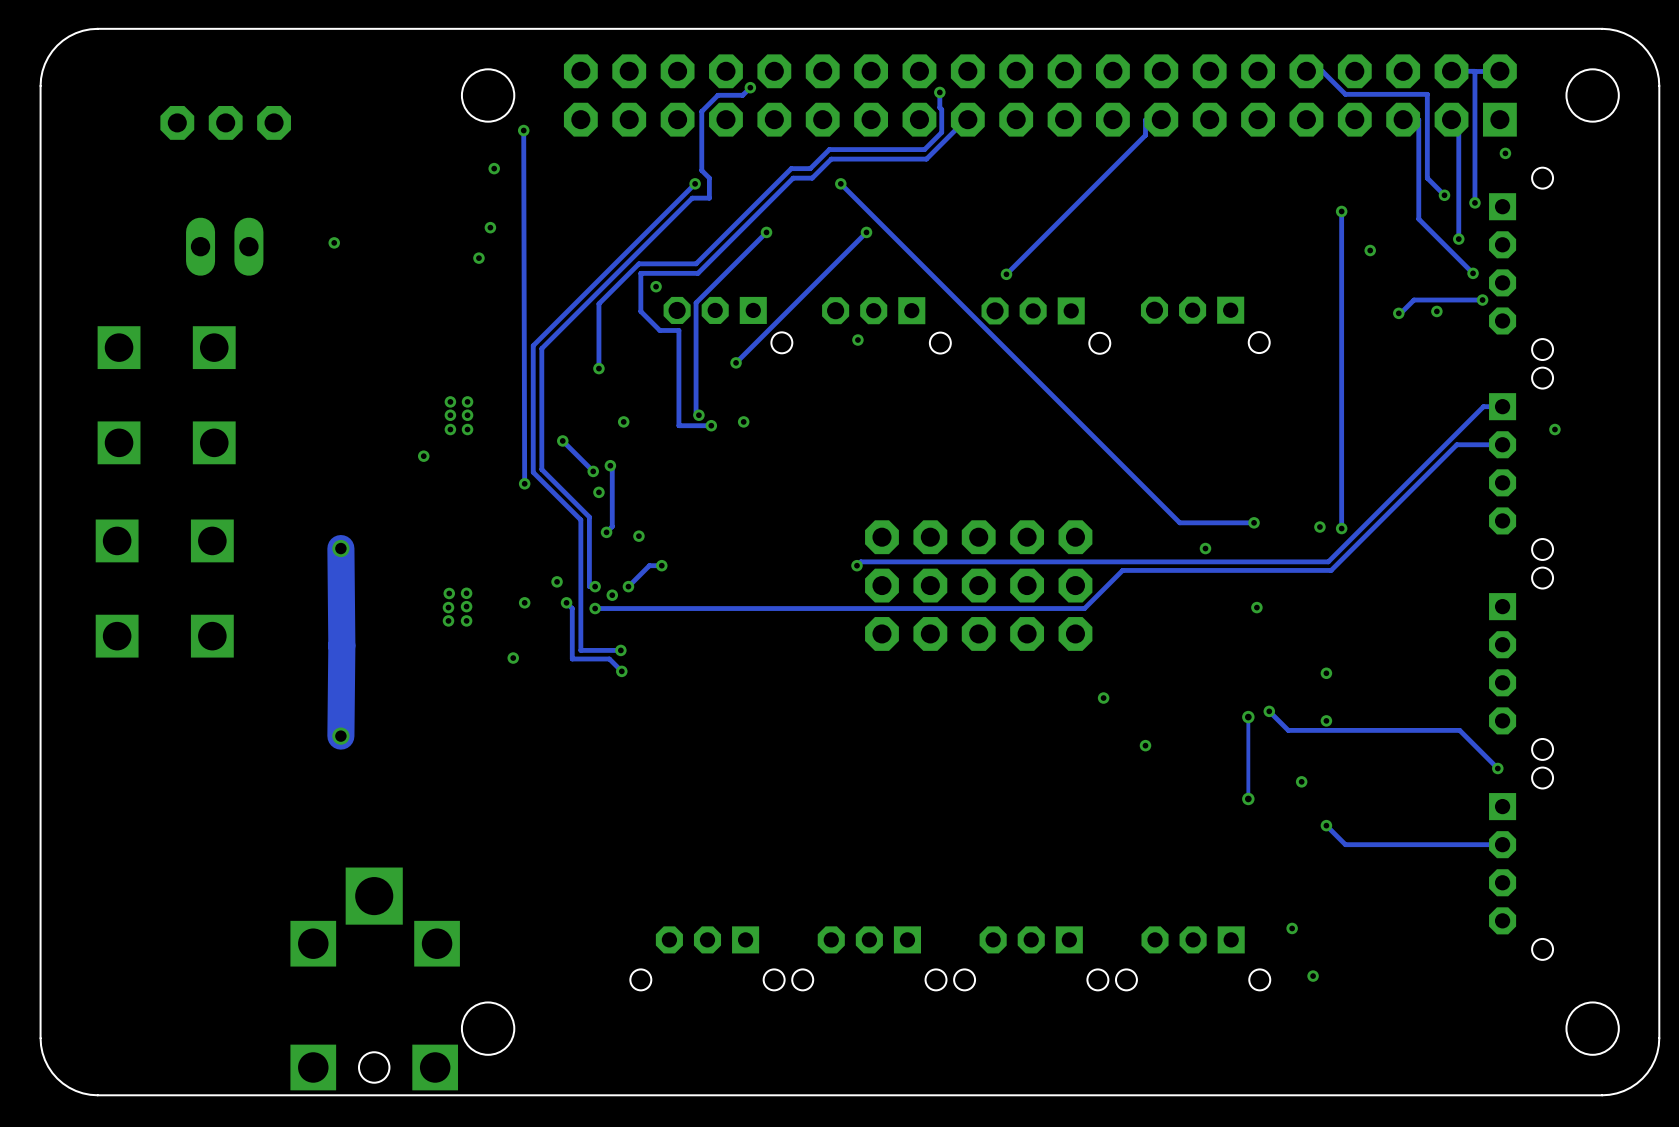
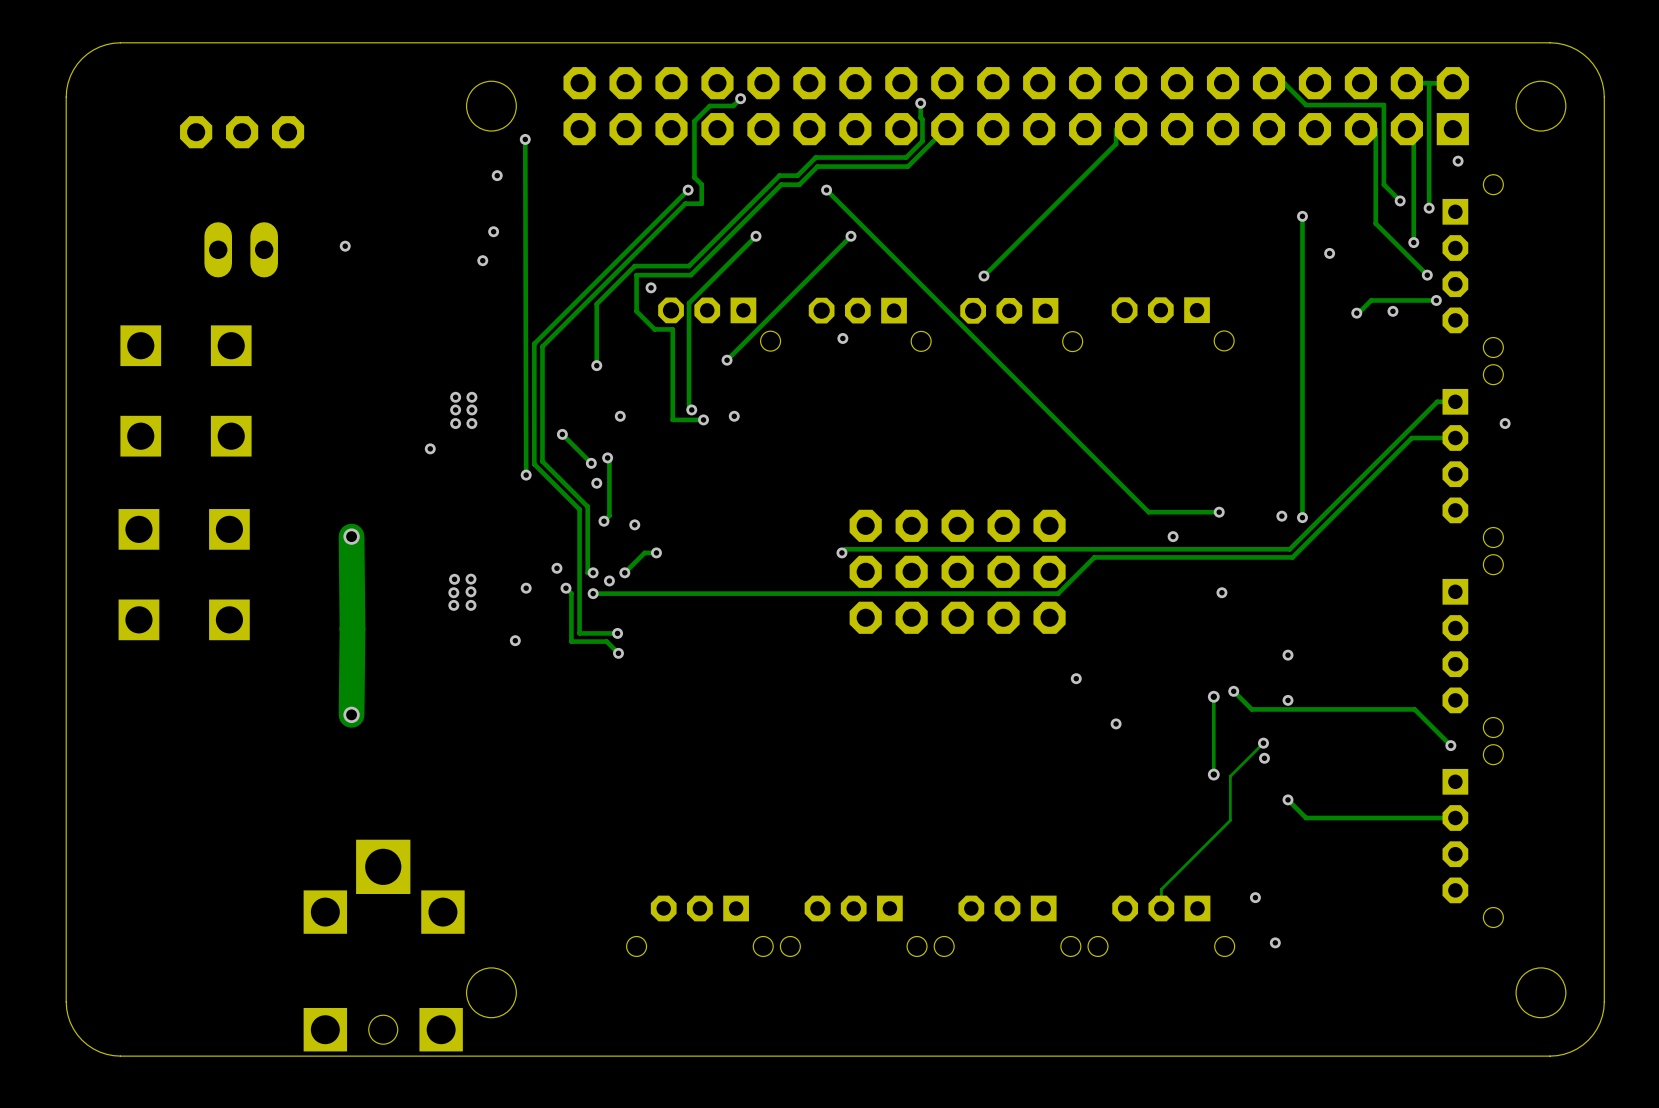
track: none -> (1263, 743) (1230, 776) (1230, 820) (1161, 889) (1161, 908)
via: none -> (1263, 743)

